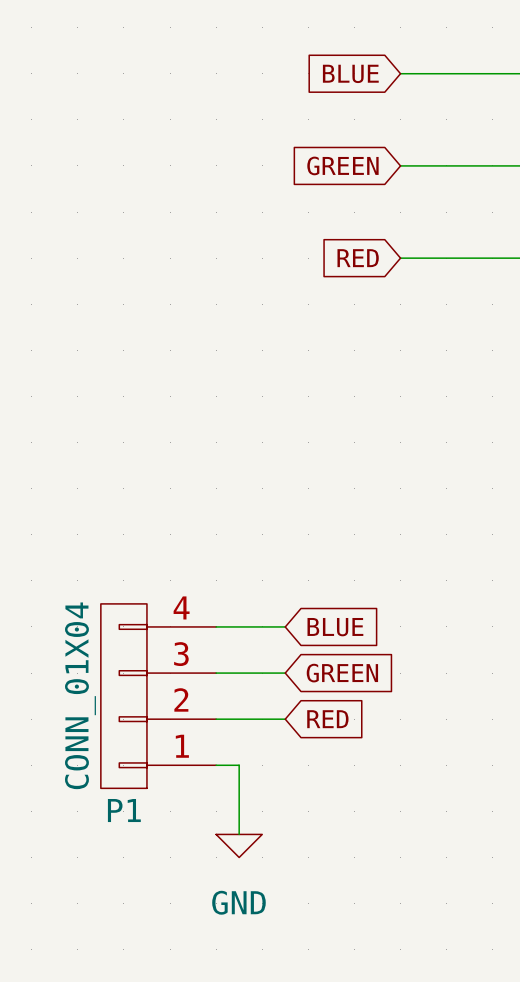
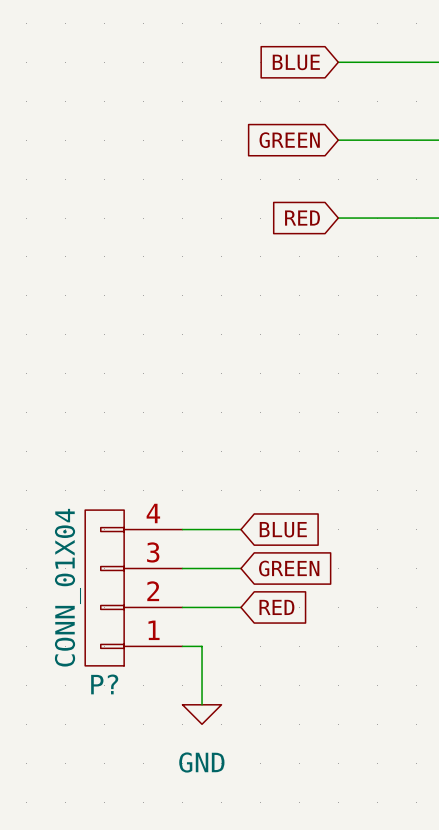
P1 name: P1 (124, 810) -> P? (104, 684)

